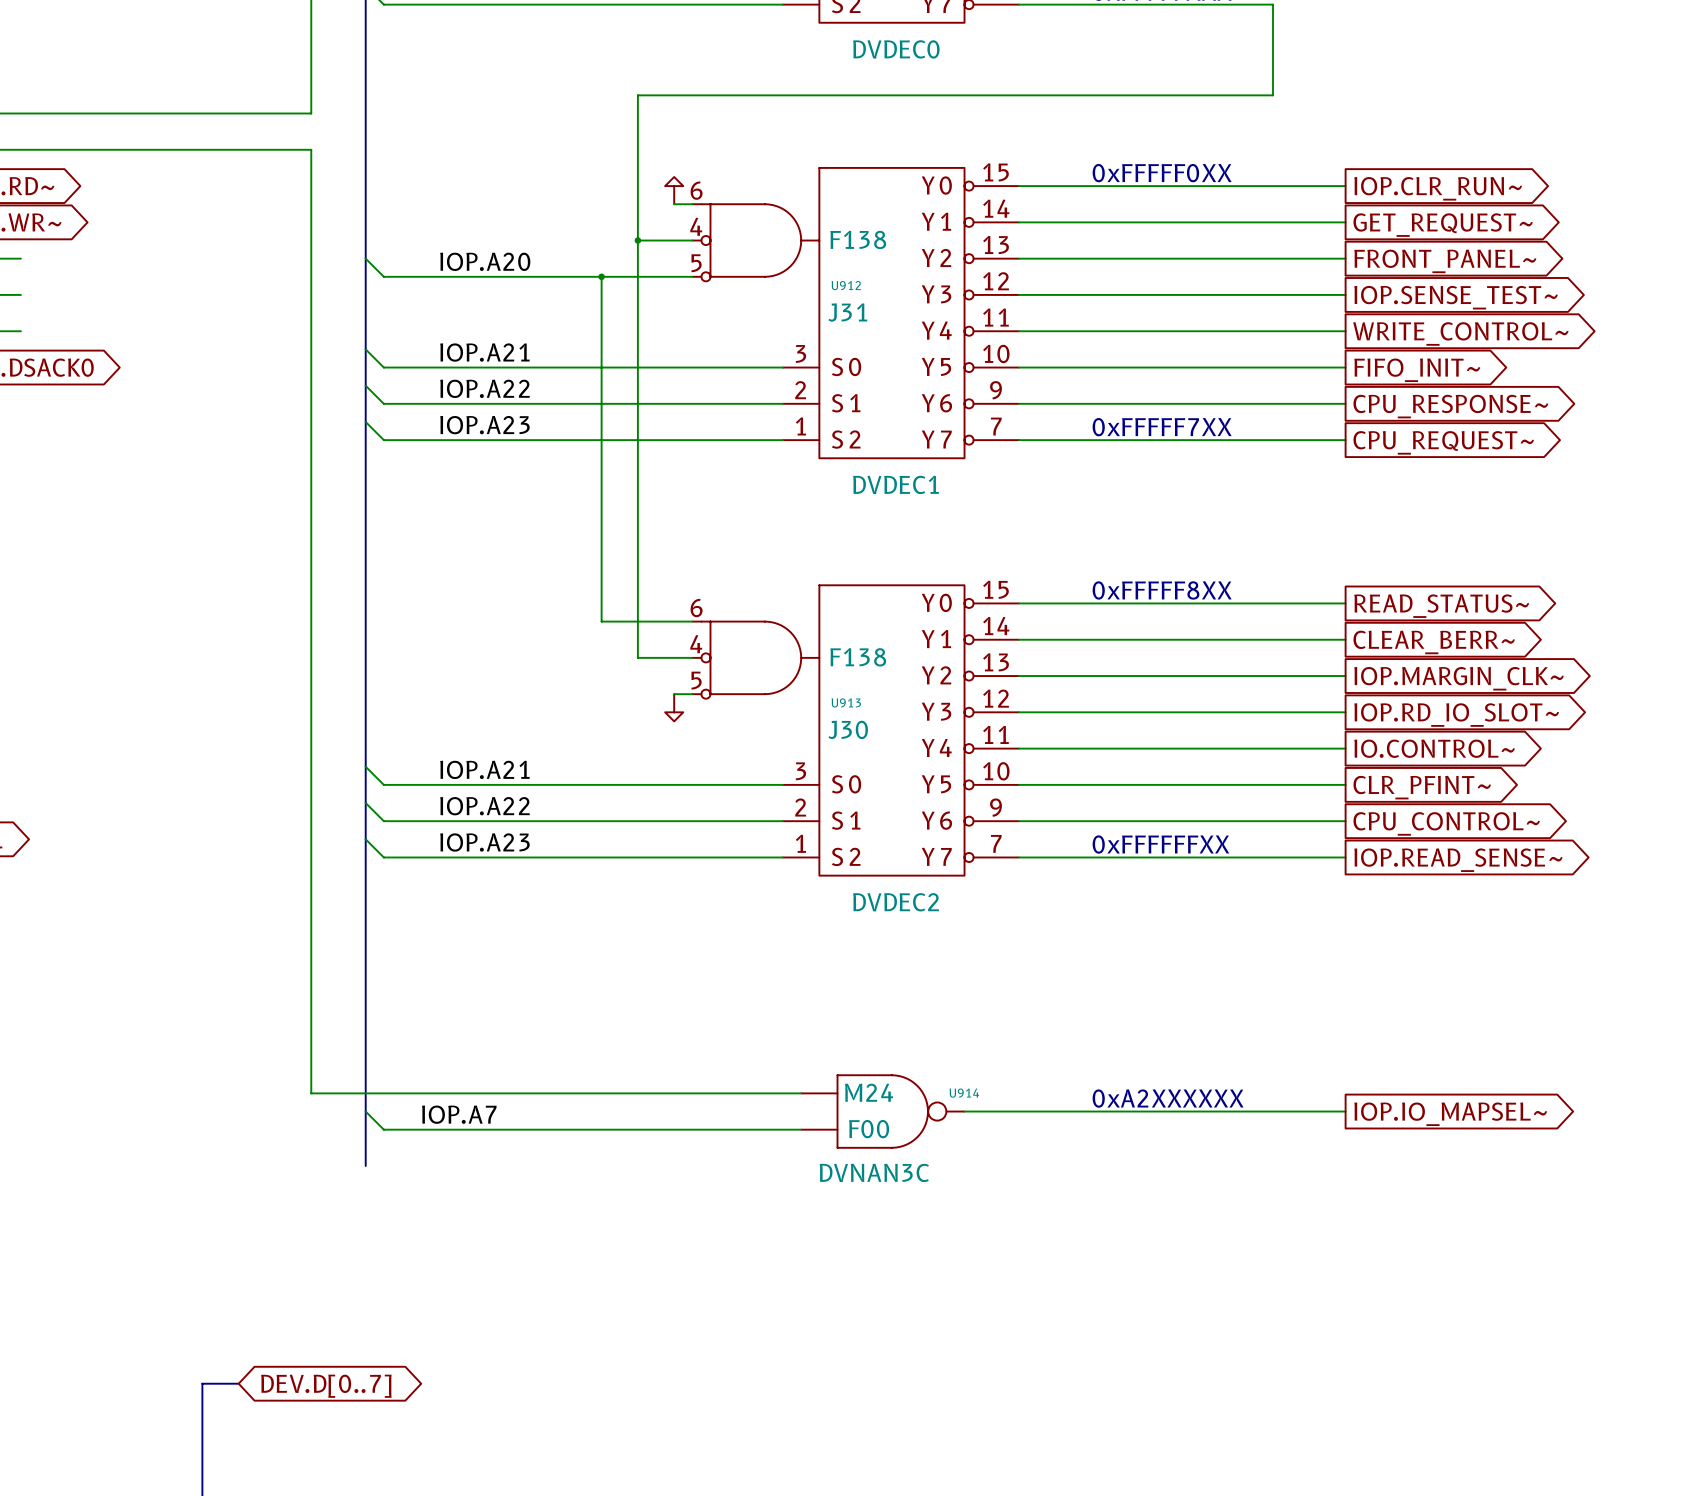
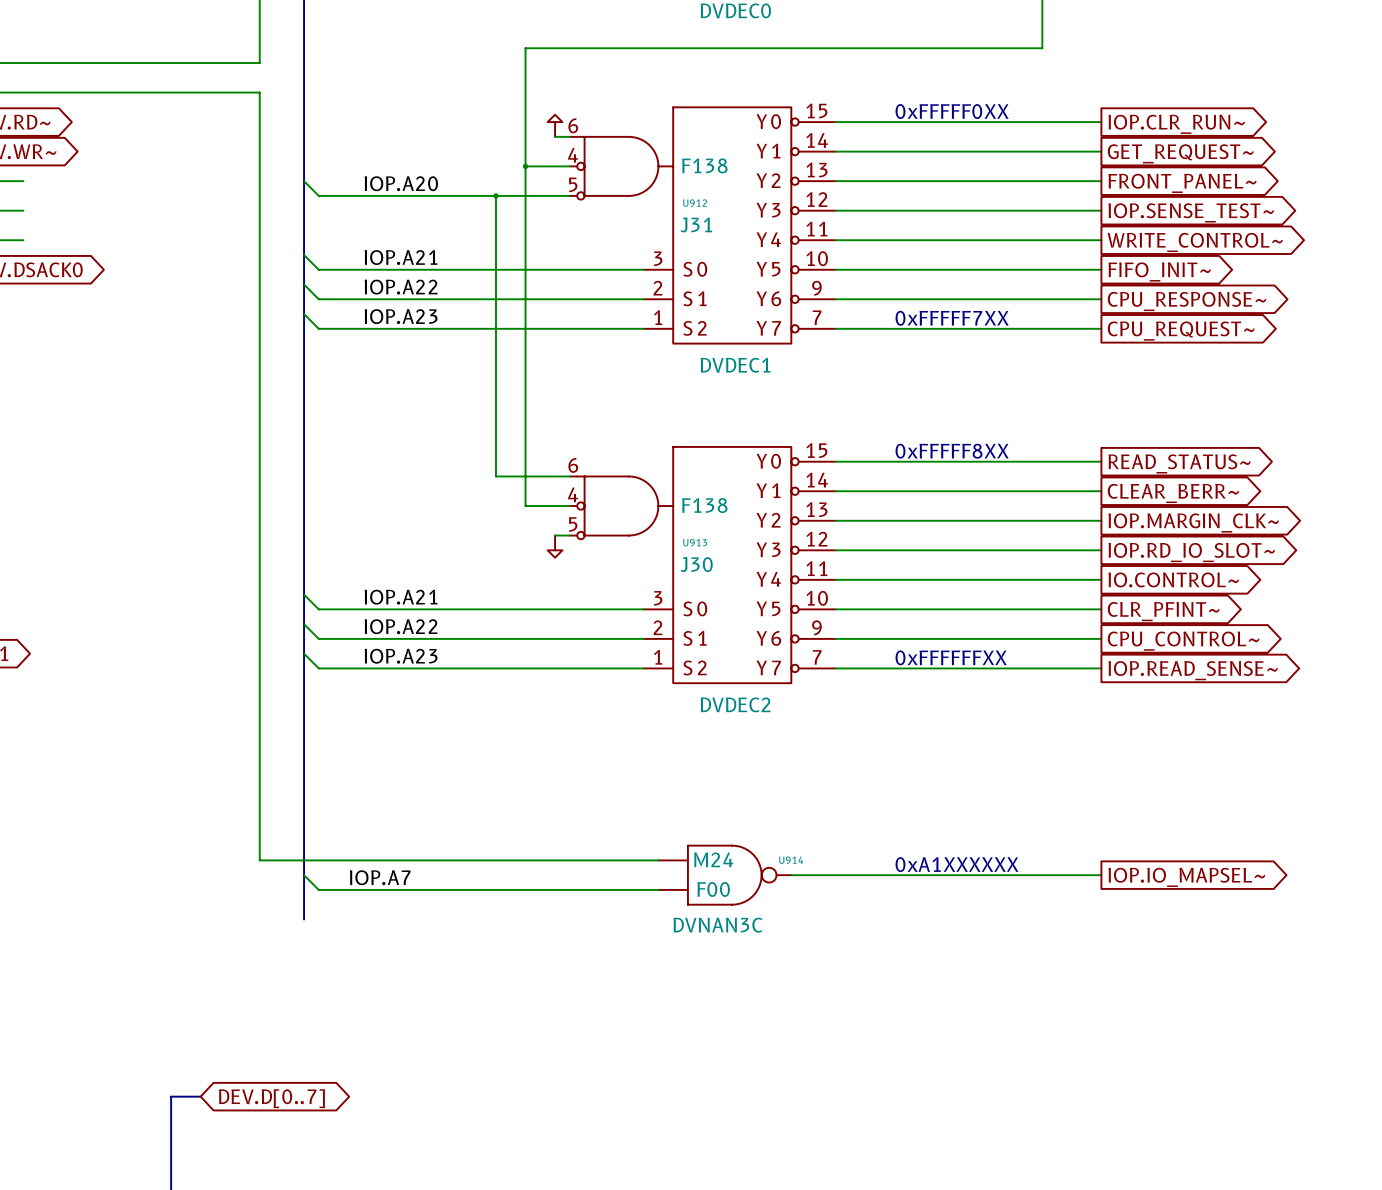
text: 0xA2XXXXXX (1168, 1098) -> 0xA1XXXXXX (956, 864)

